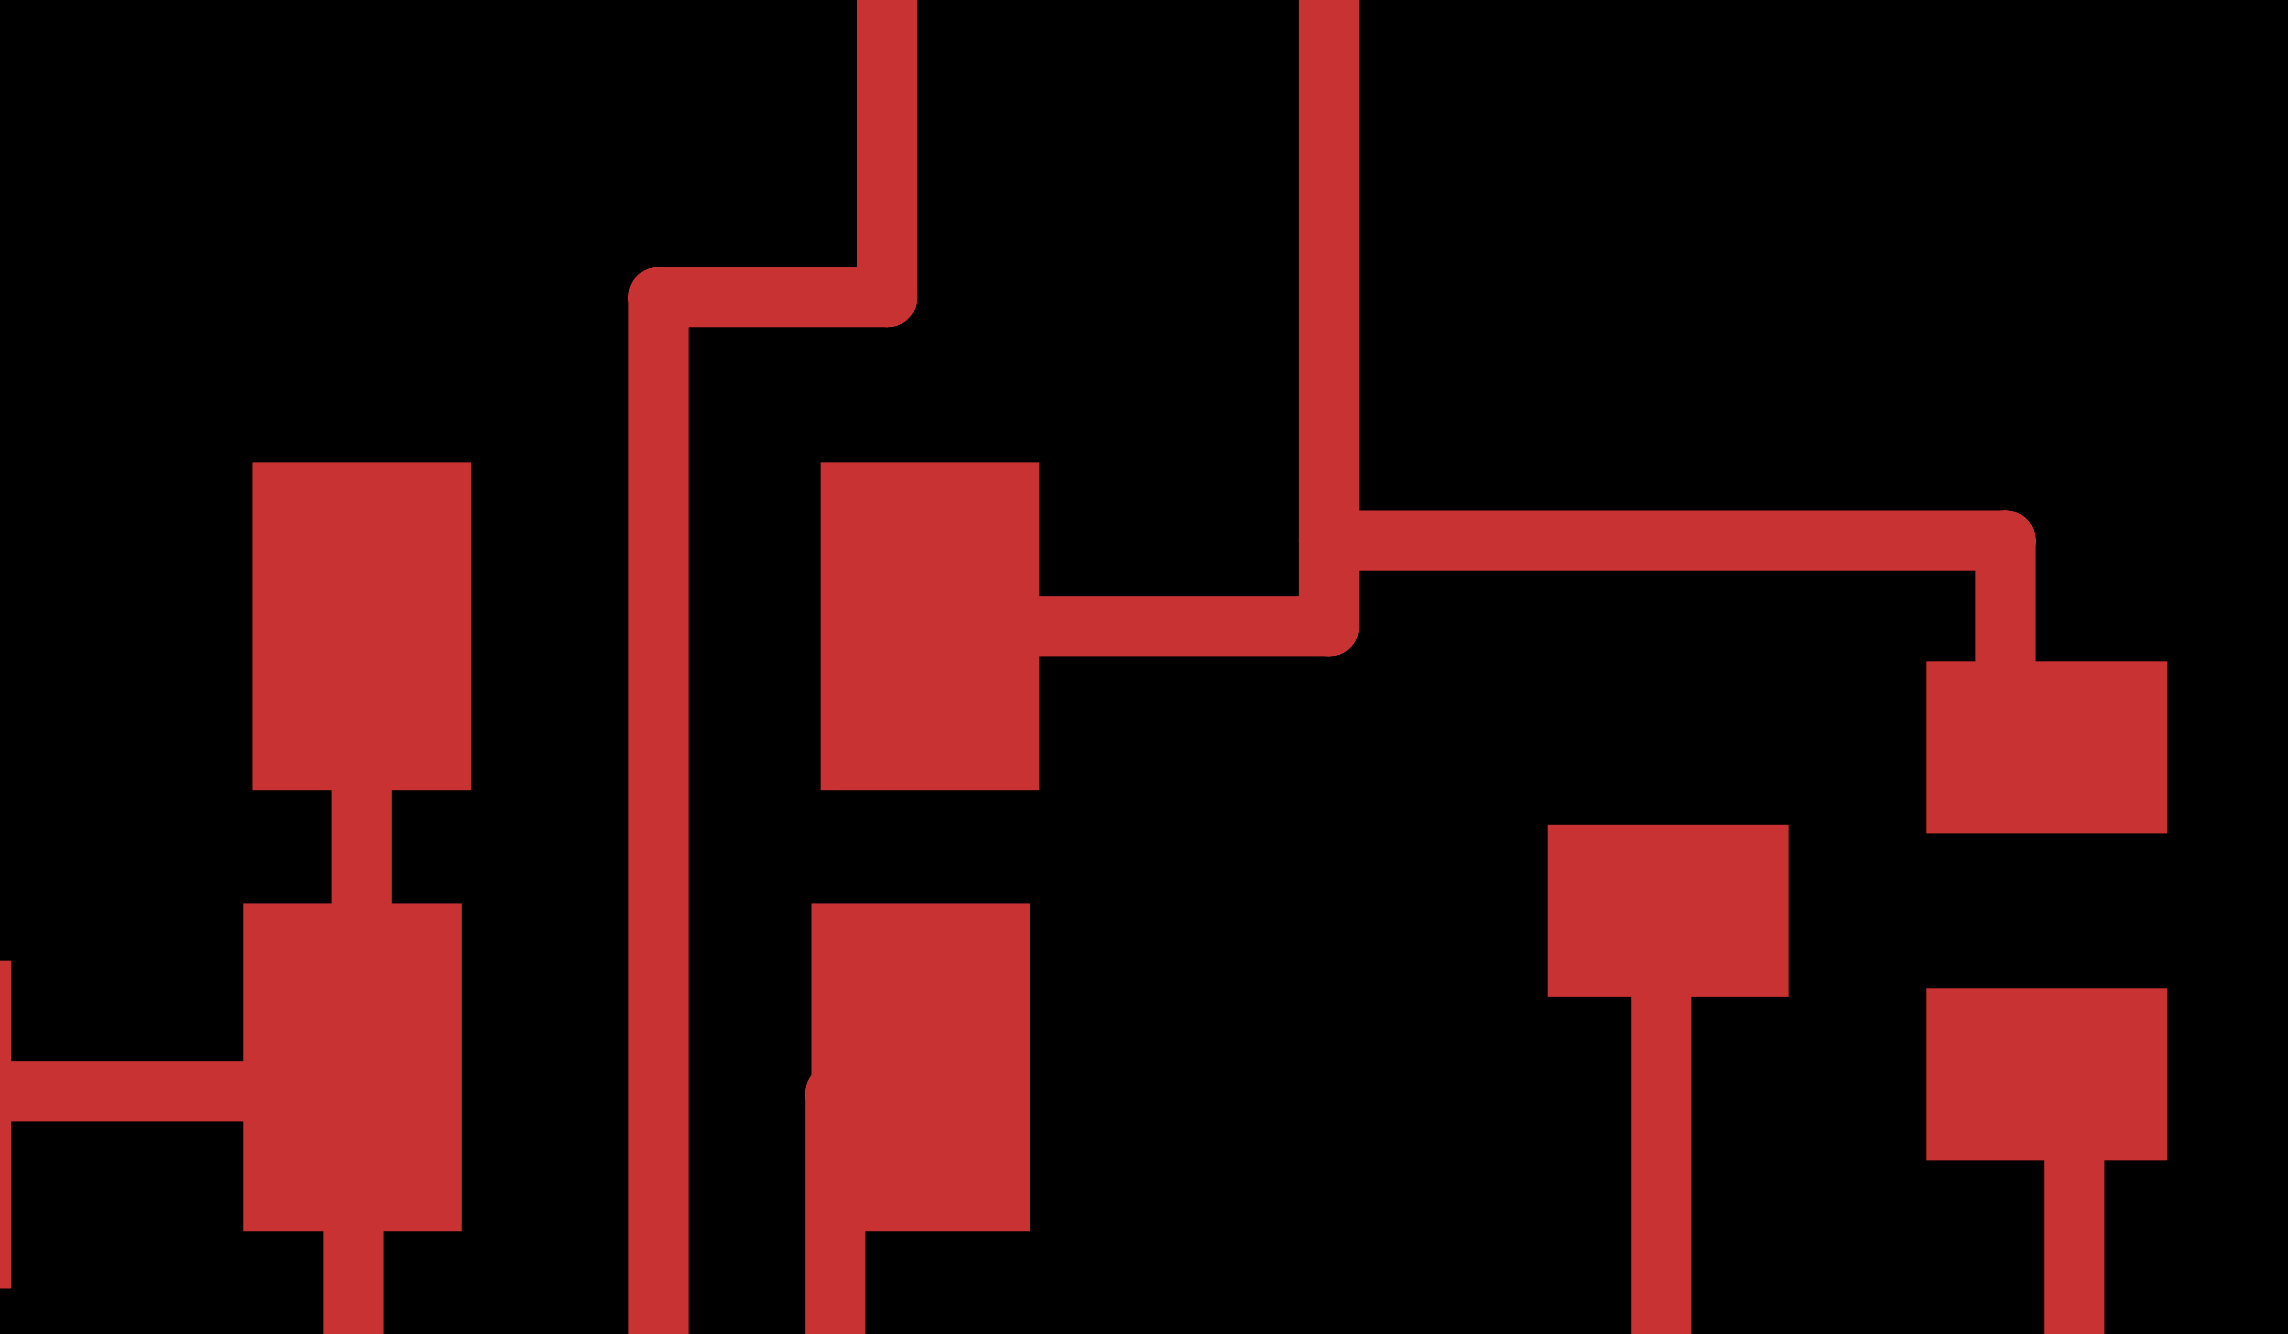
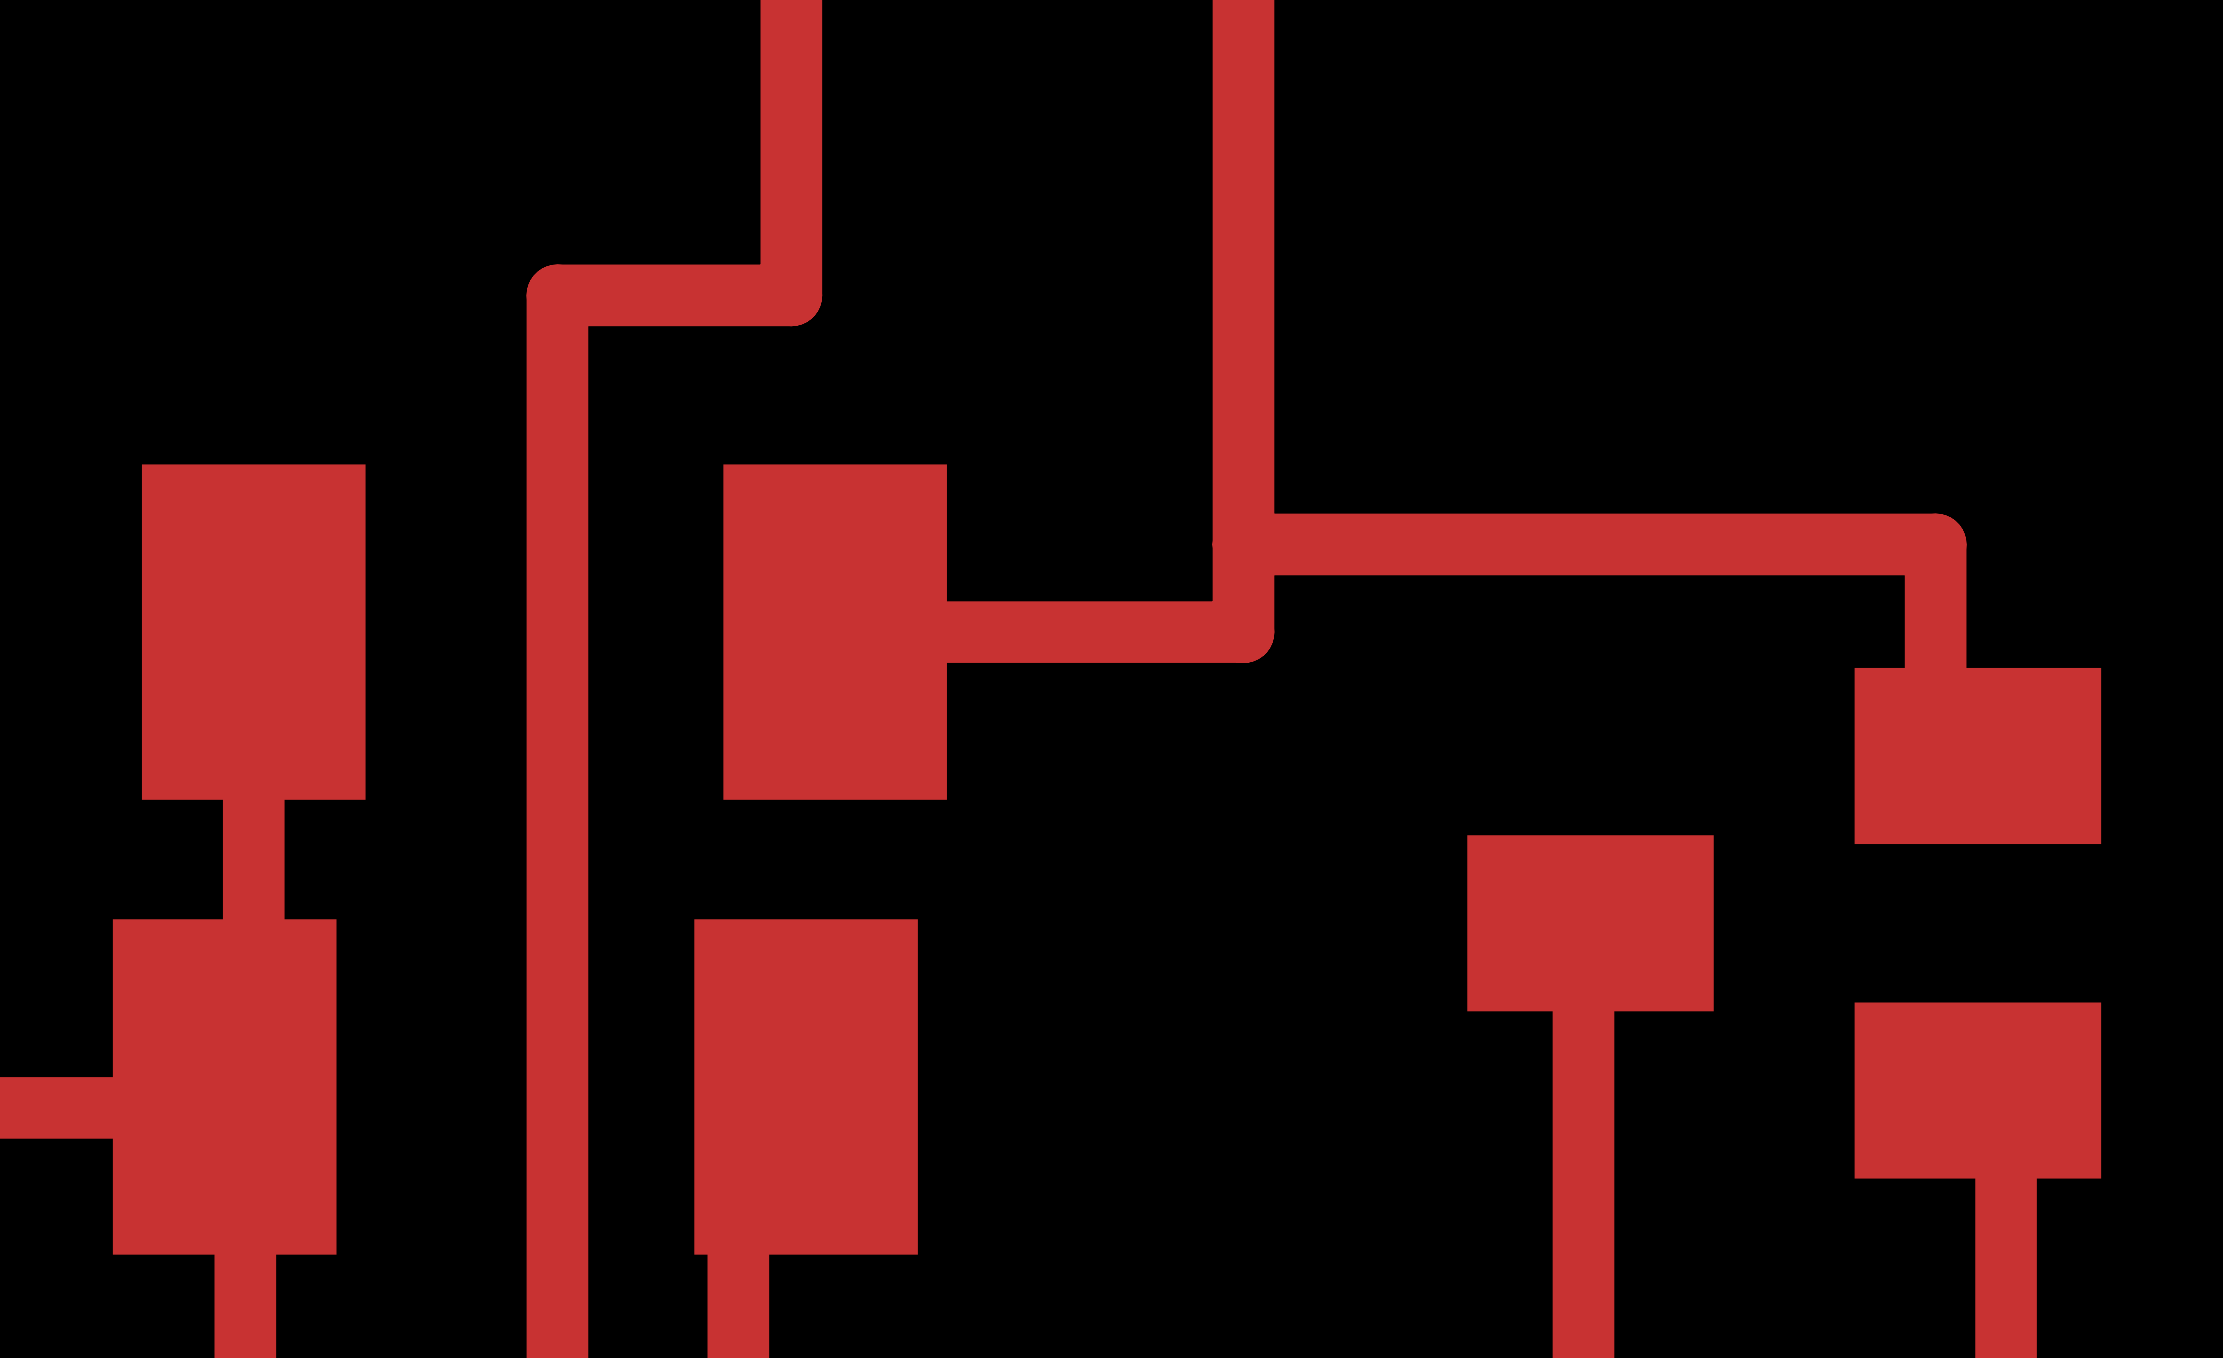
part position: (636, 1067) -> (515, 1086)

